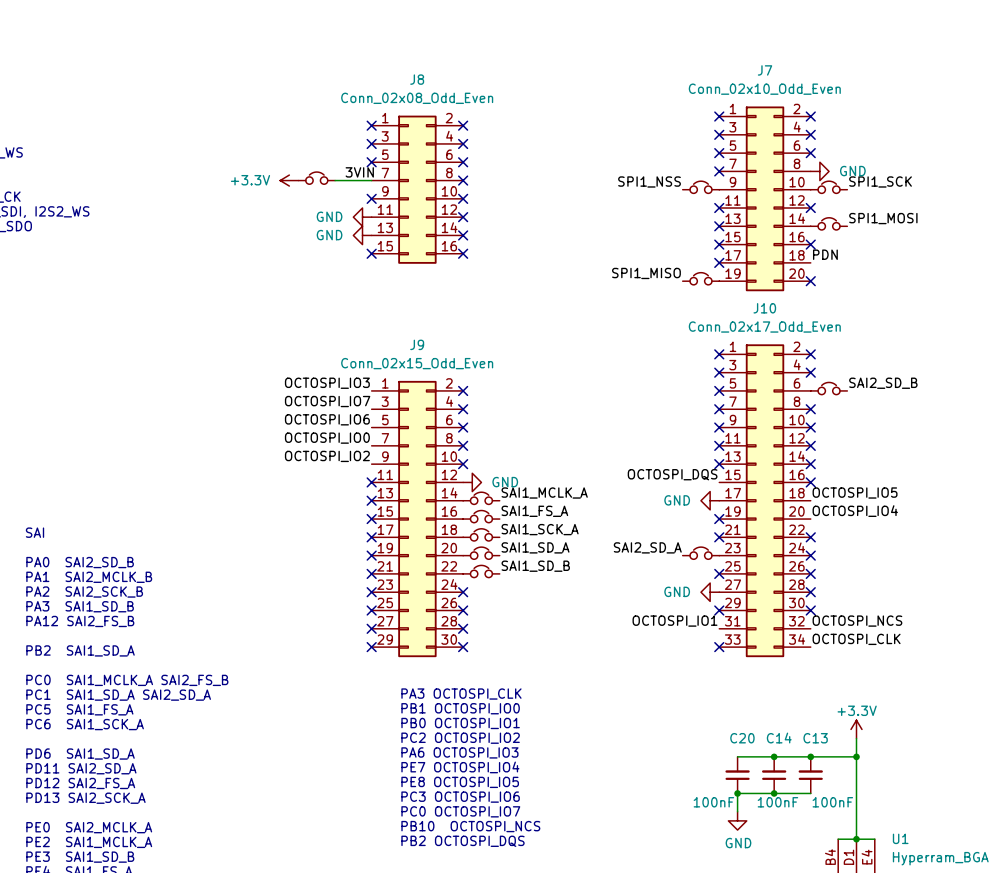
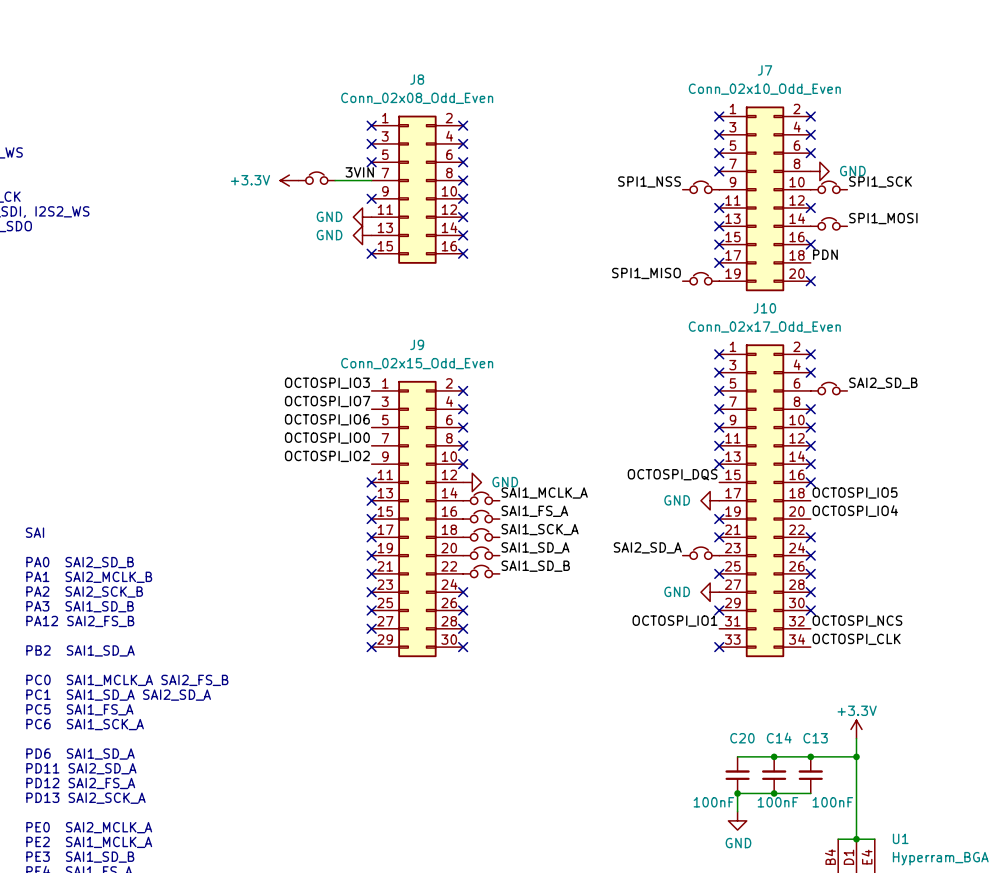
text: PA3 OCTOSPI_CLK (461, 694) -> none
text: PB1 OCTOSPI_IO0 (460, 708) -> none
text: PB0 OCTOSPI_IO1 (460, 723) -> none
text: PC2 OCTOSPI_IO2 (460, 738) -> none
text: PA6 OCTOSPI_IO3 (459, 752) -> none
text: PE7 OCTOSPI_IO4 (460, 767) -> none
text: PE8 OCTOSPI_IO5 (460, 782) -> none
text: PC3 OCTOSPI_IO6 (460, 797) -> none
text: PC0 OCTOSPI_IO7 (460, 811) -> none
text: PB10 OCTOSPI_NCS (470, 826) -> none
text: PB2 OCTOSPI_DQS (462, 841) -> none

